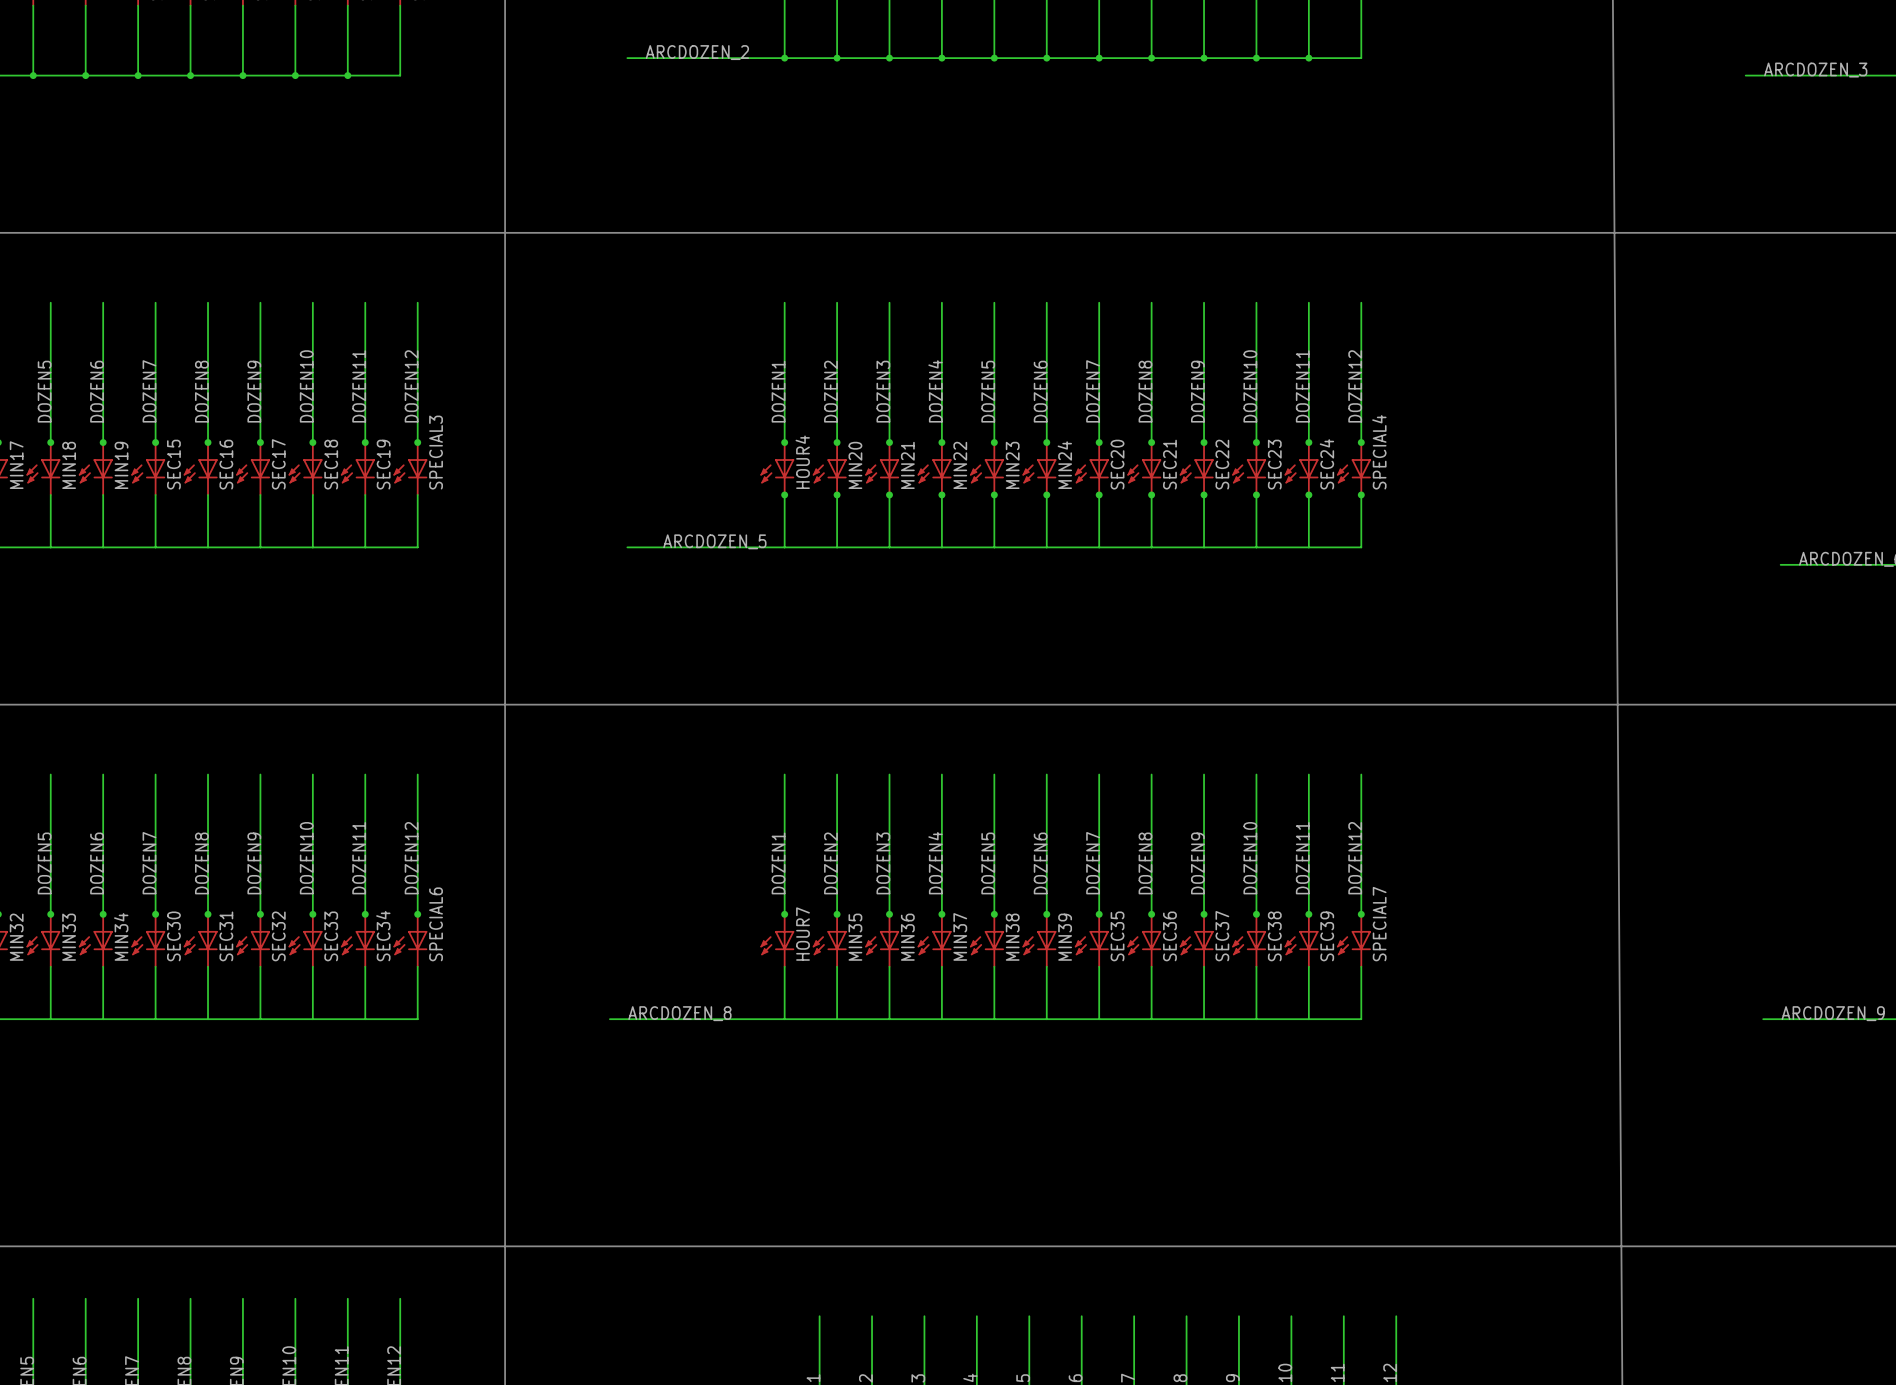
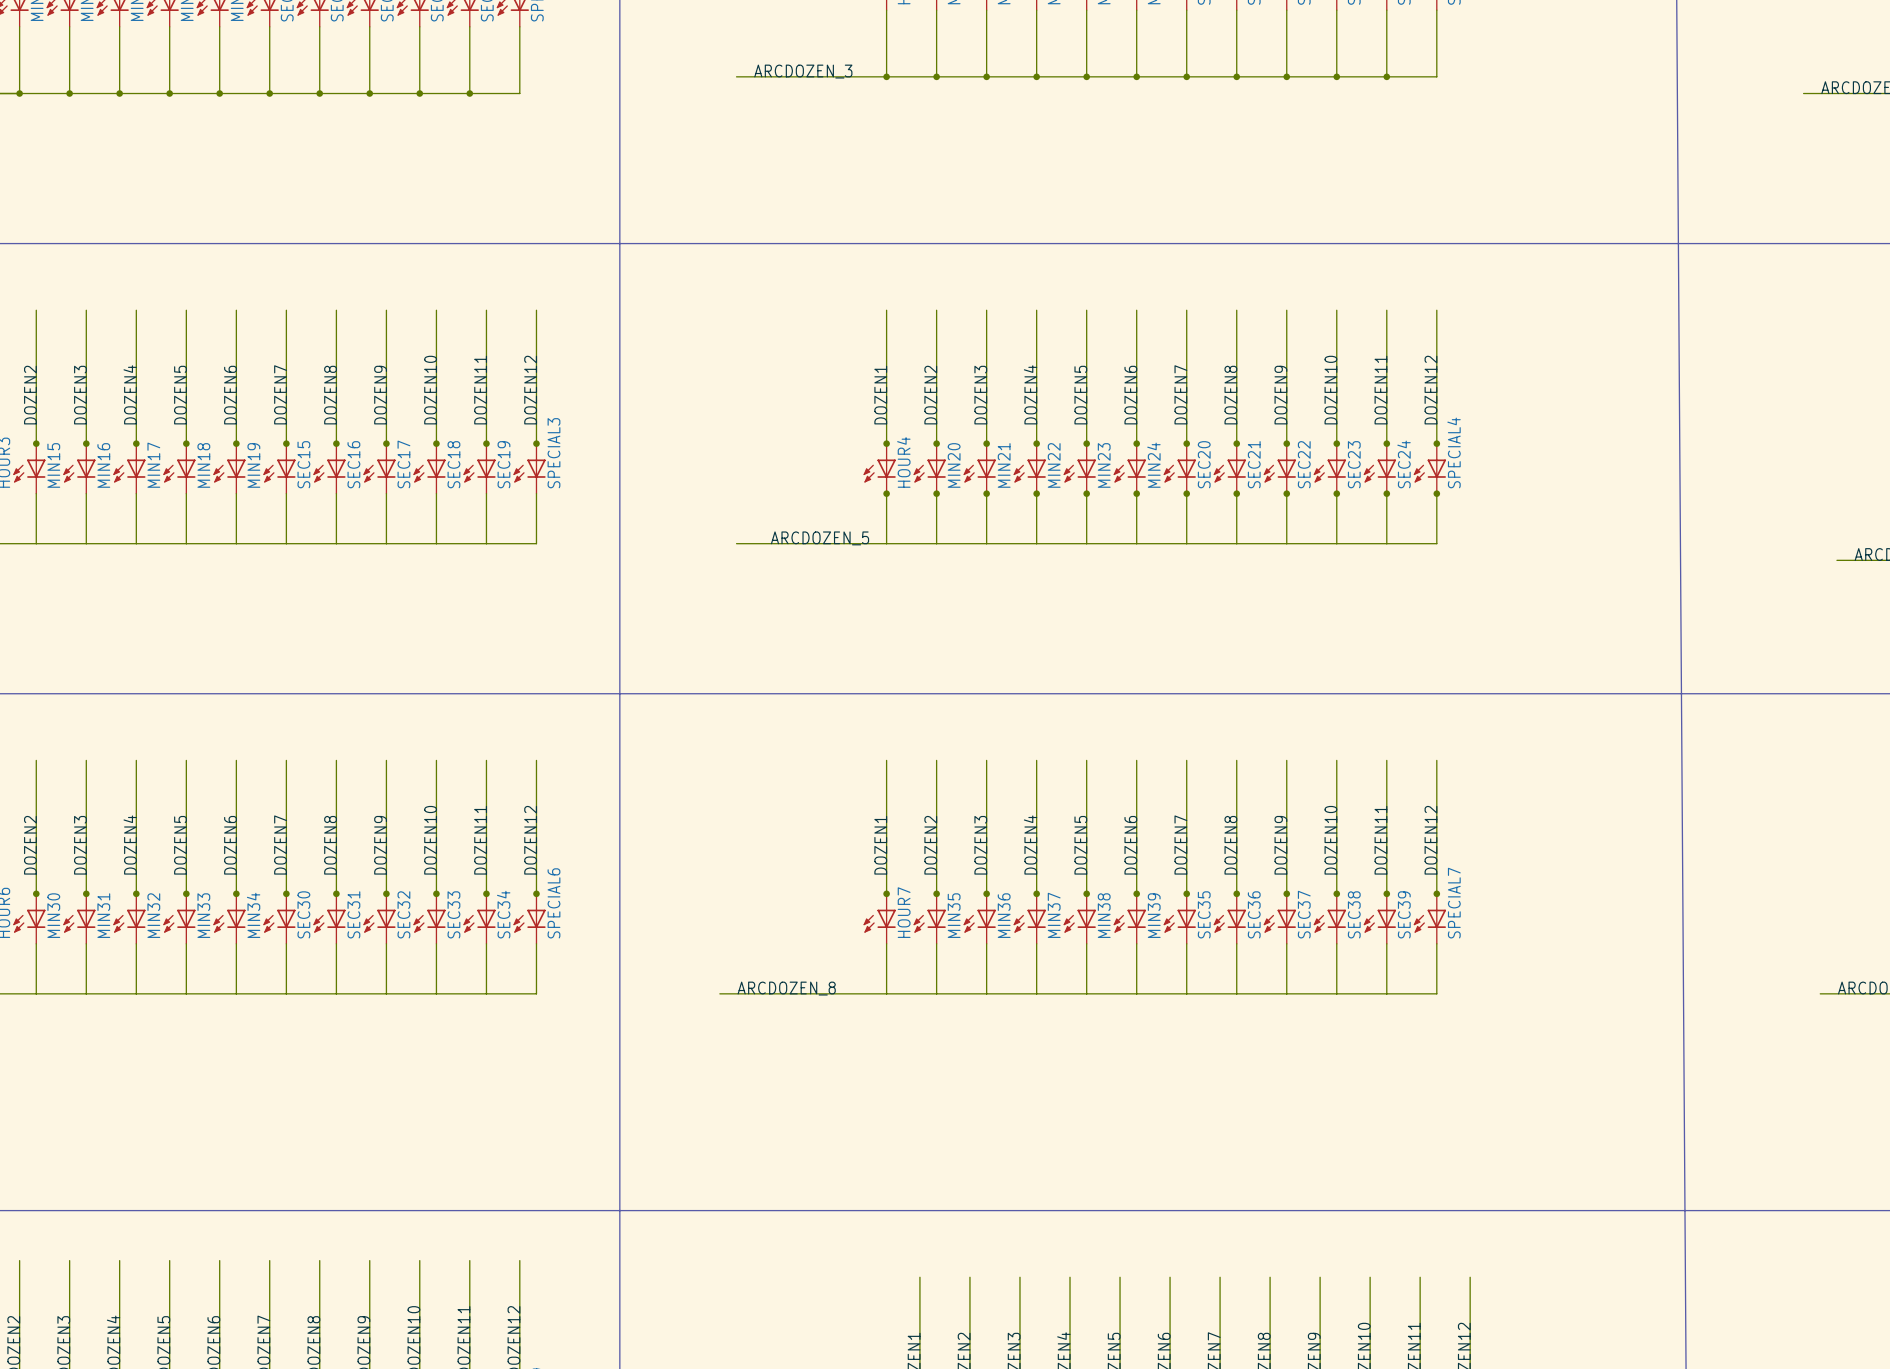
label: ARCDOZEN_2 (697, 52) -> ARCDOZEN_3 (803, 71)

